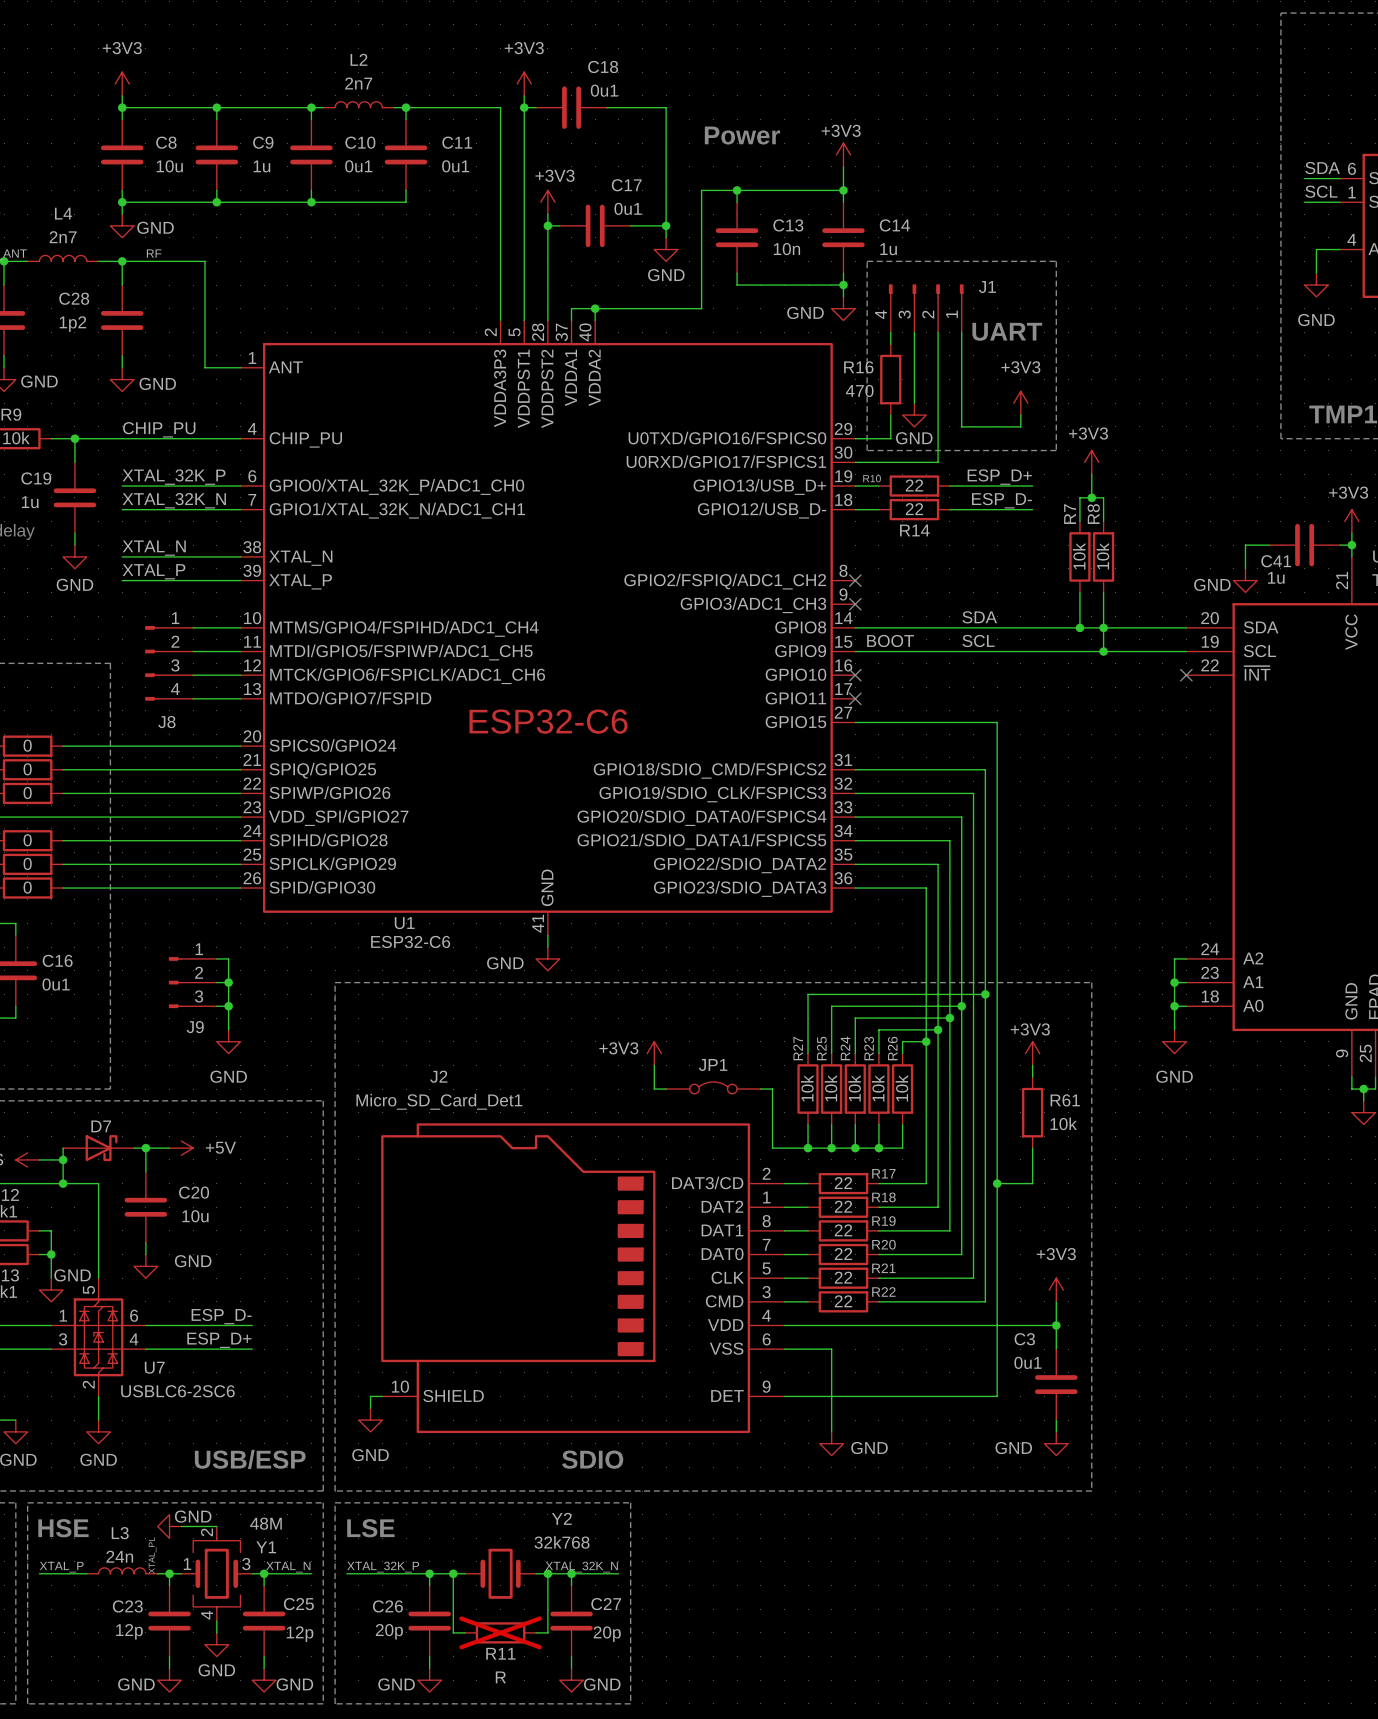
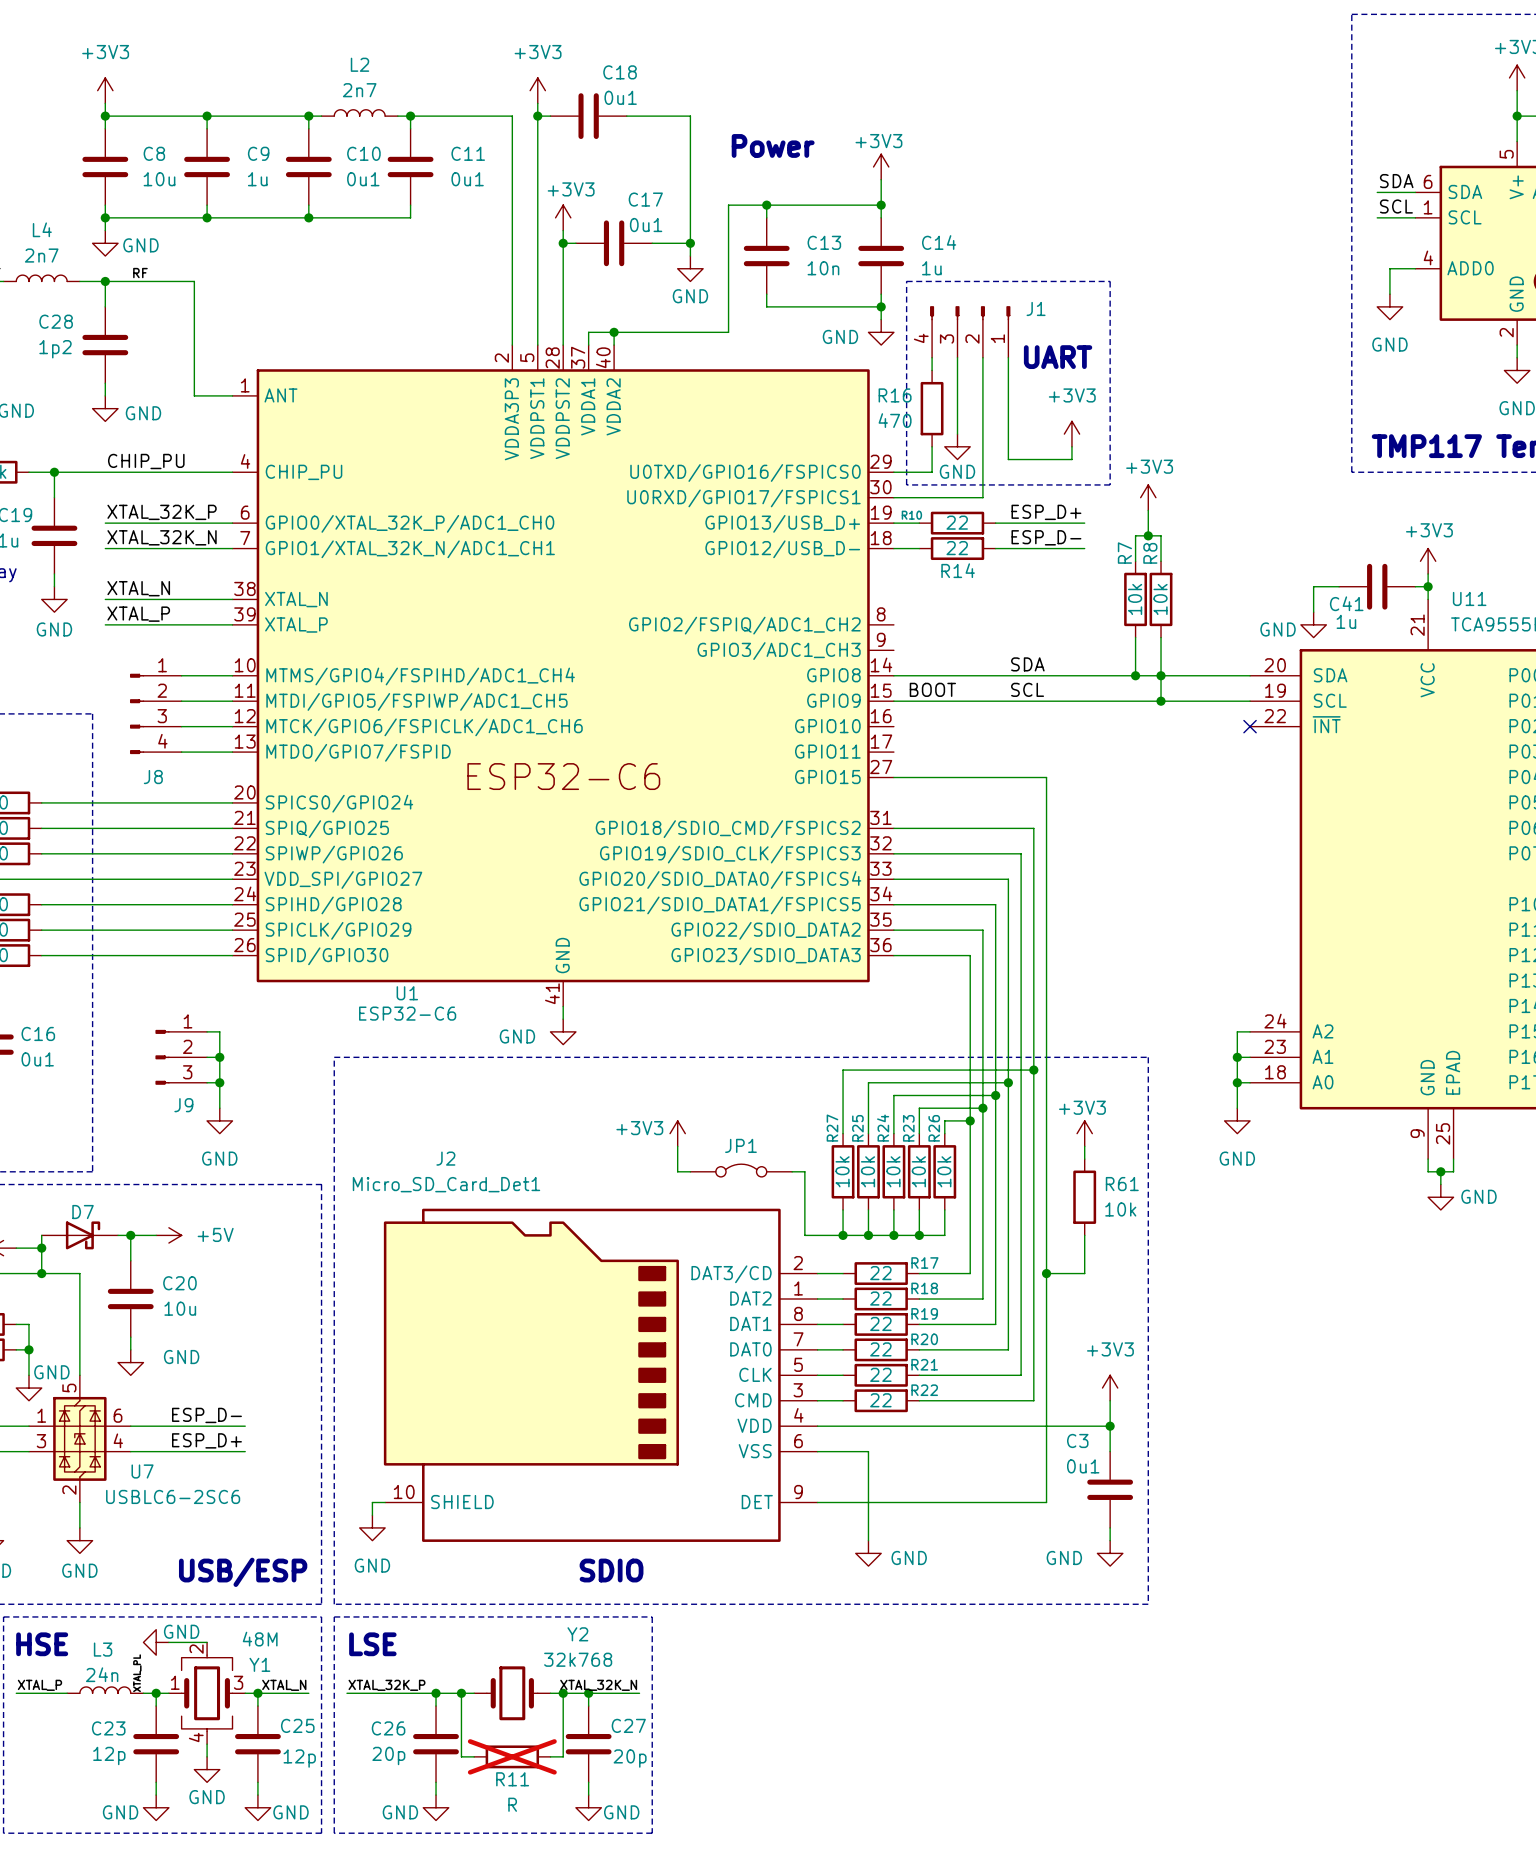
no-connect mark: (855, 580) -> none
no-connect mark: (855, 604) -> none
no-connect mark: (855, 675) -> none
no-connect mark: (855, 698) -> none

